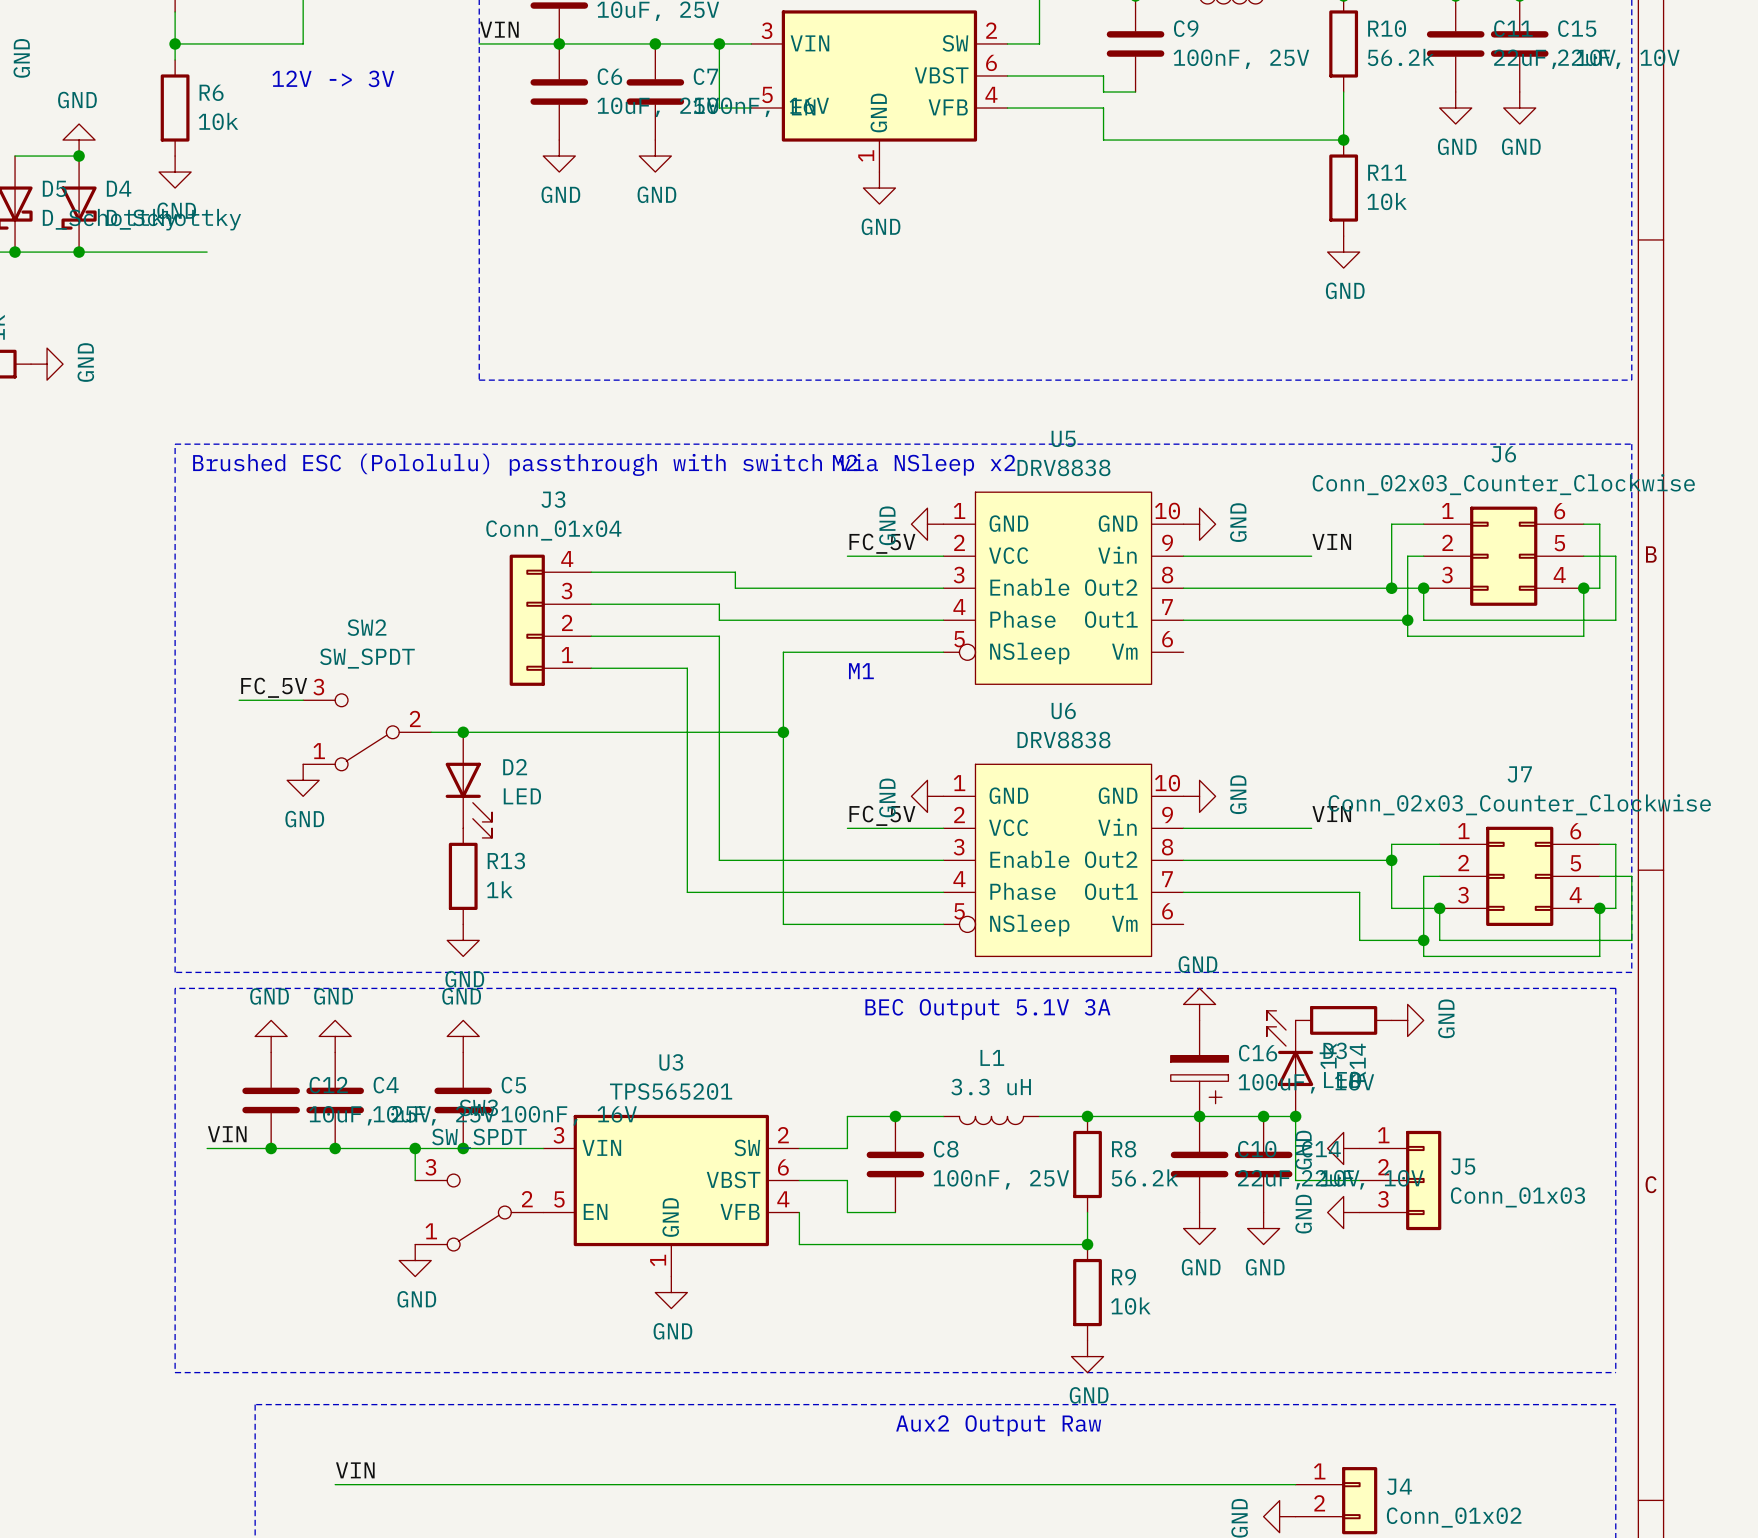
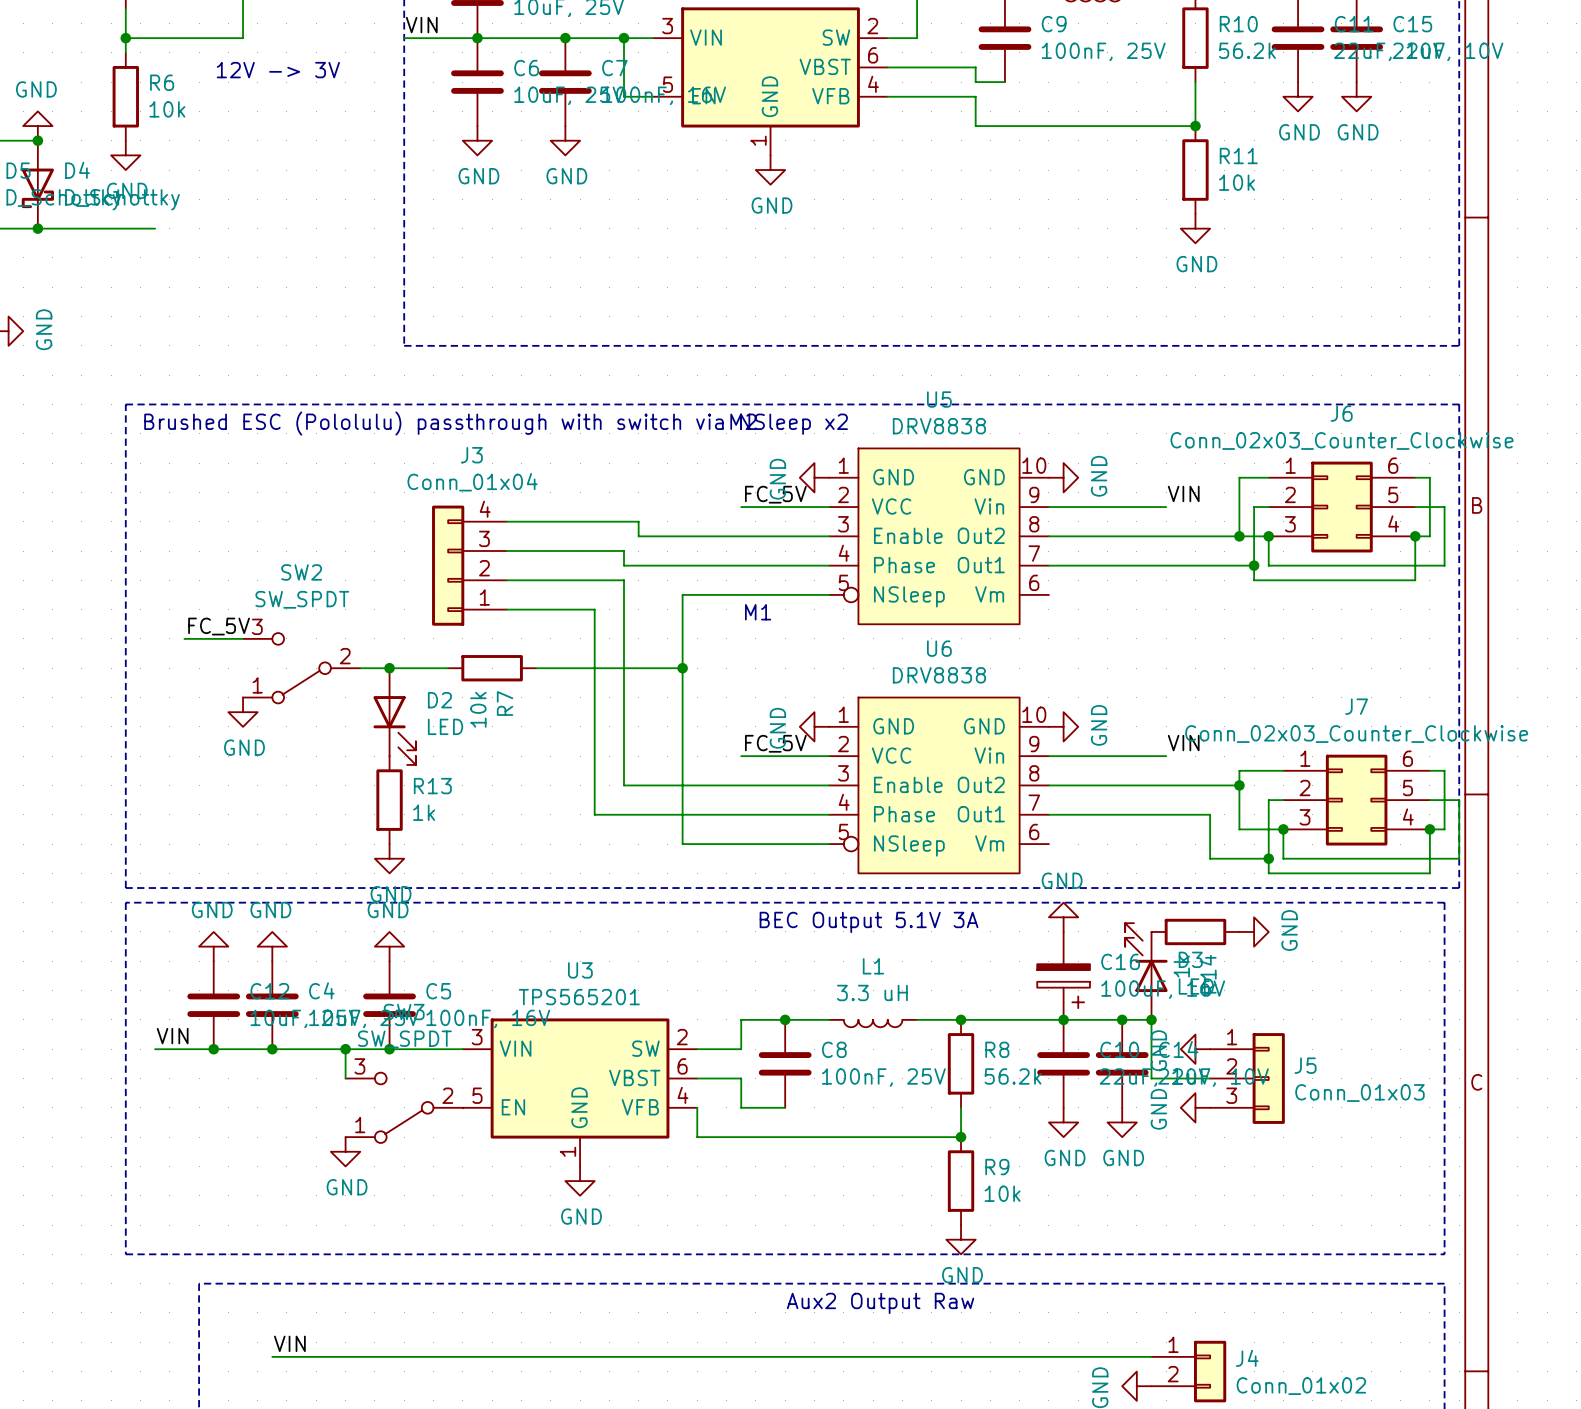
wire: (527, 732) (623, 732) -> none
R7: none -> 10k (492, 668)

